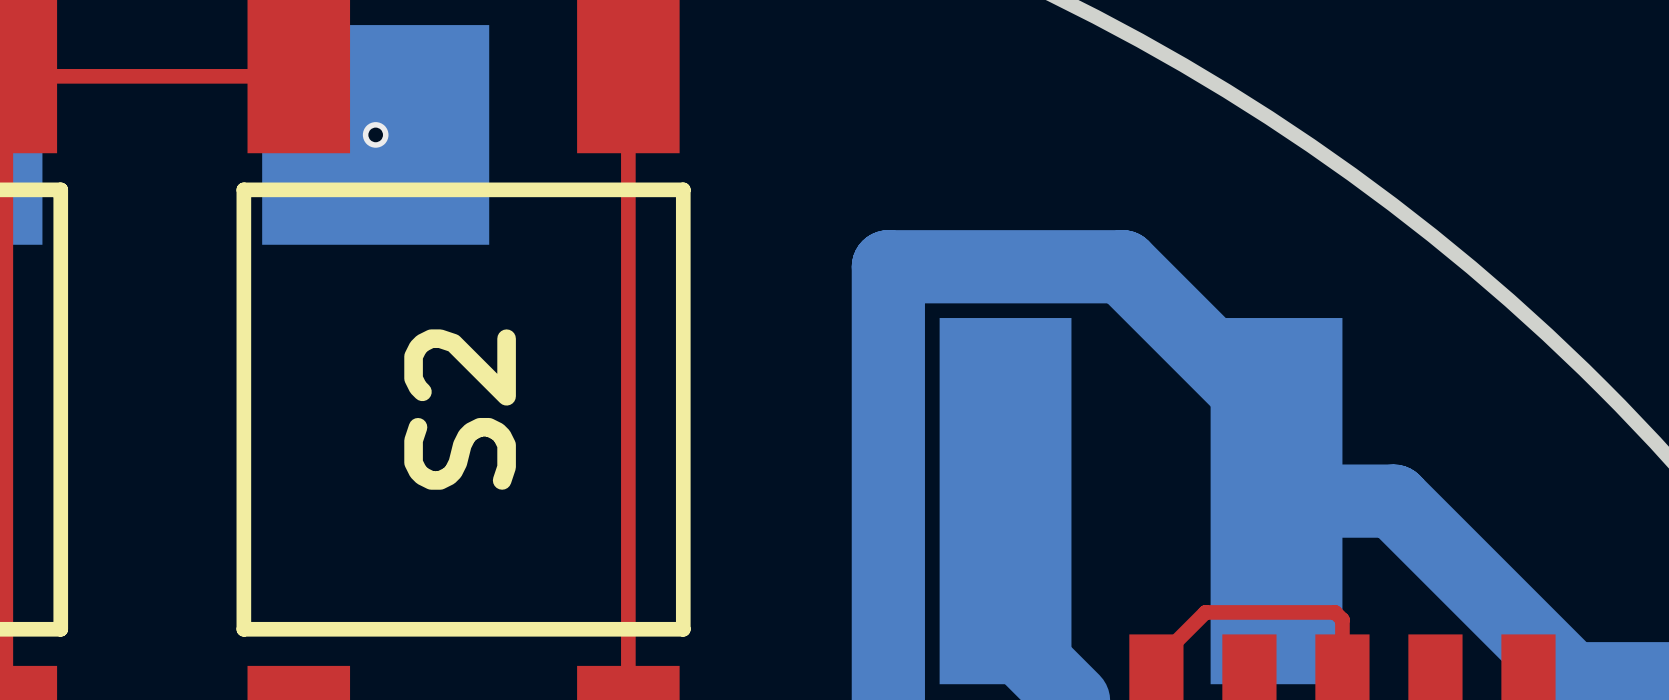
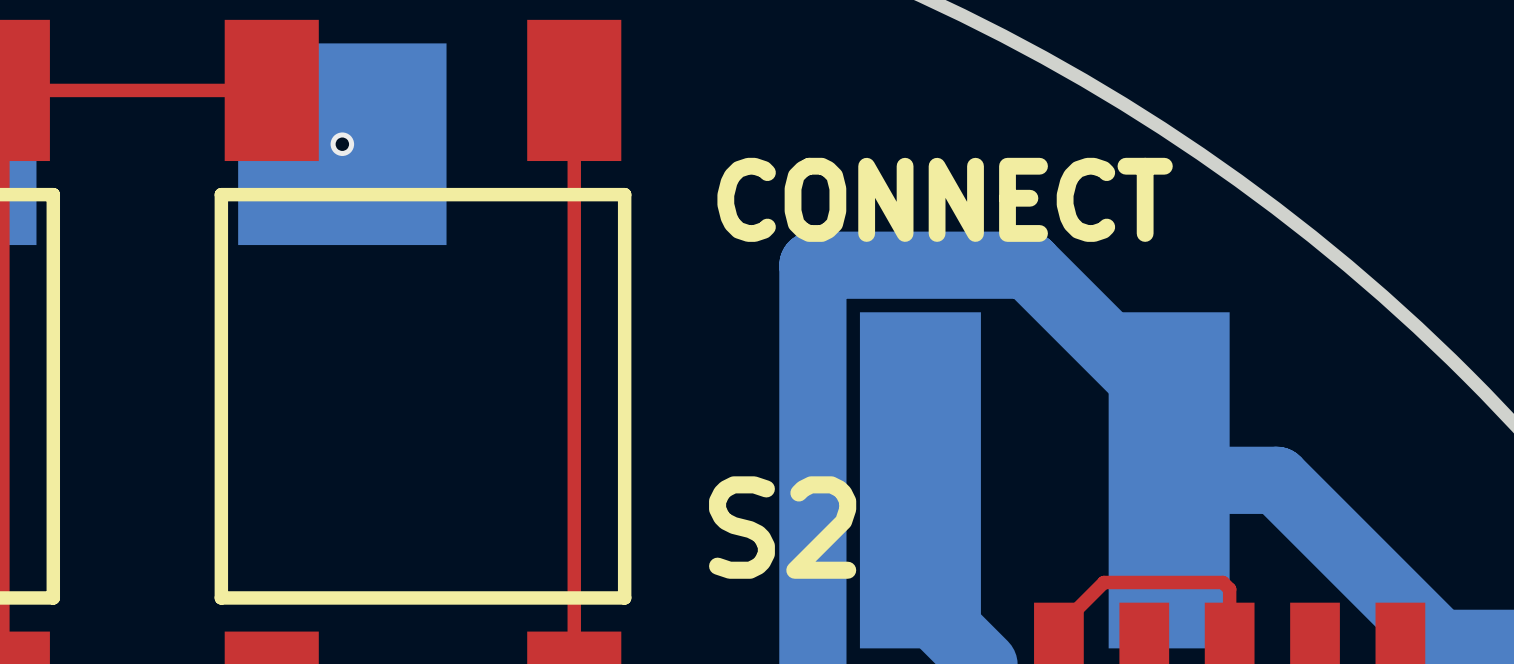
text: none -> CONNECT (945, 199)
S2 name rotation: 0° (460, 409) -> 90° clockwise (782, 527)
S2 name position: S2 (460, 409) -> S2 (782, 527)

